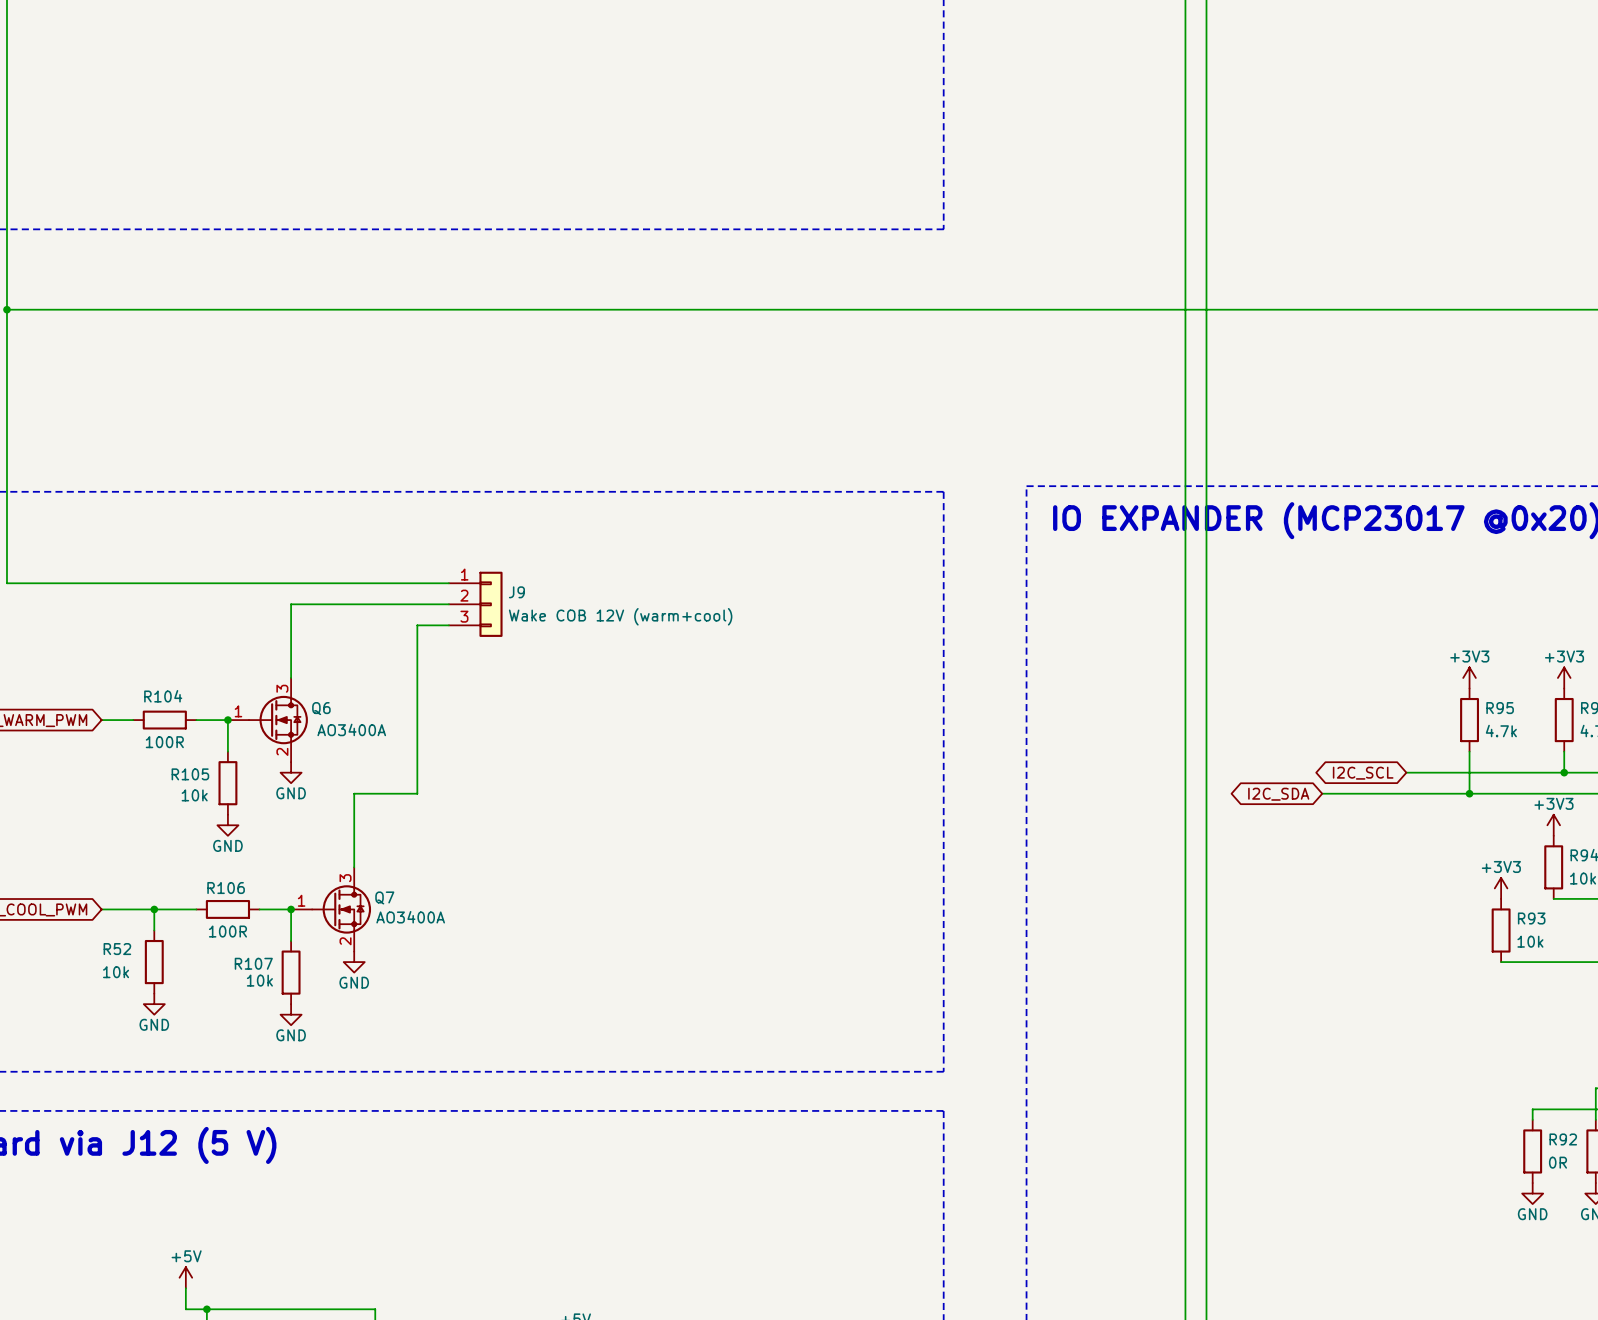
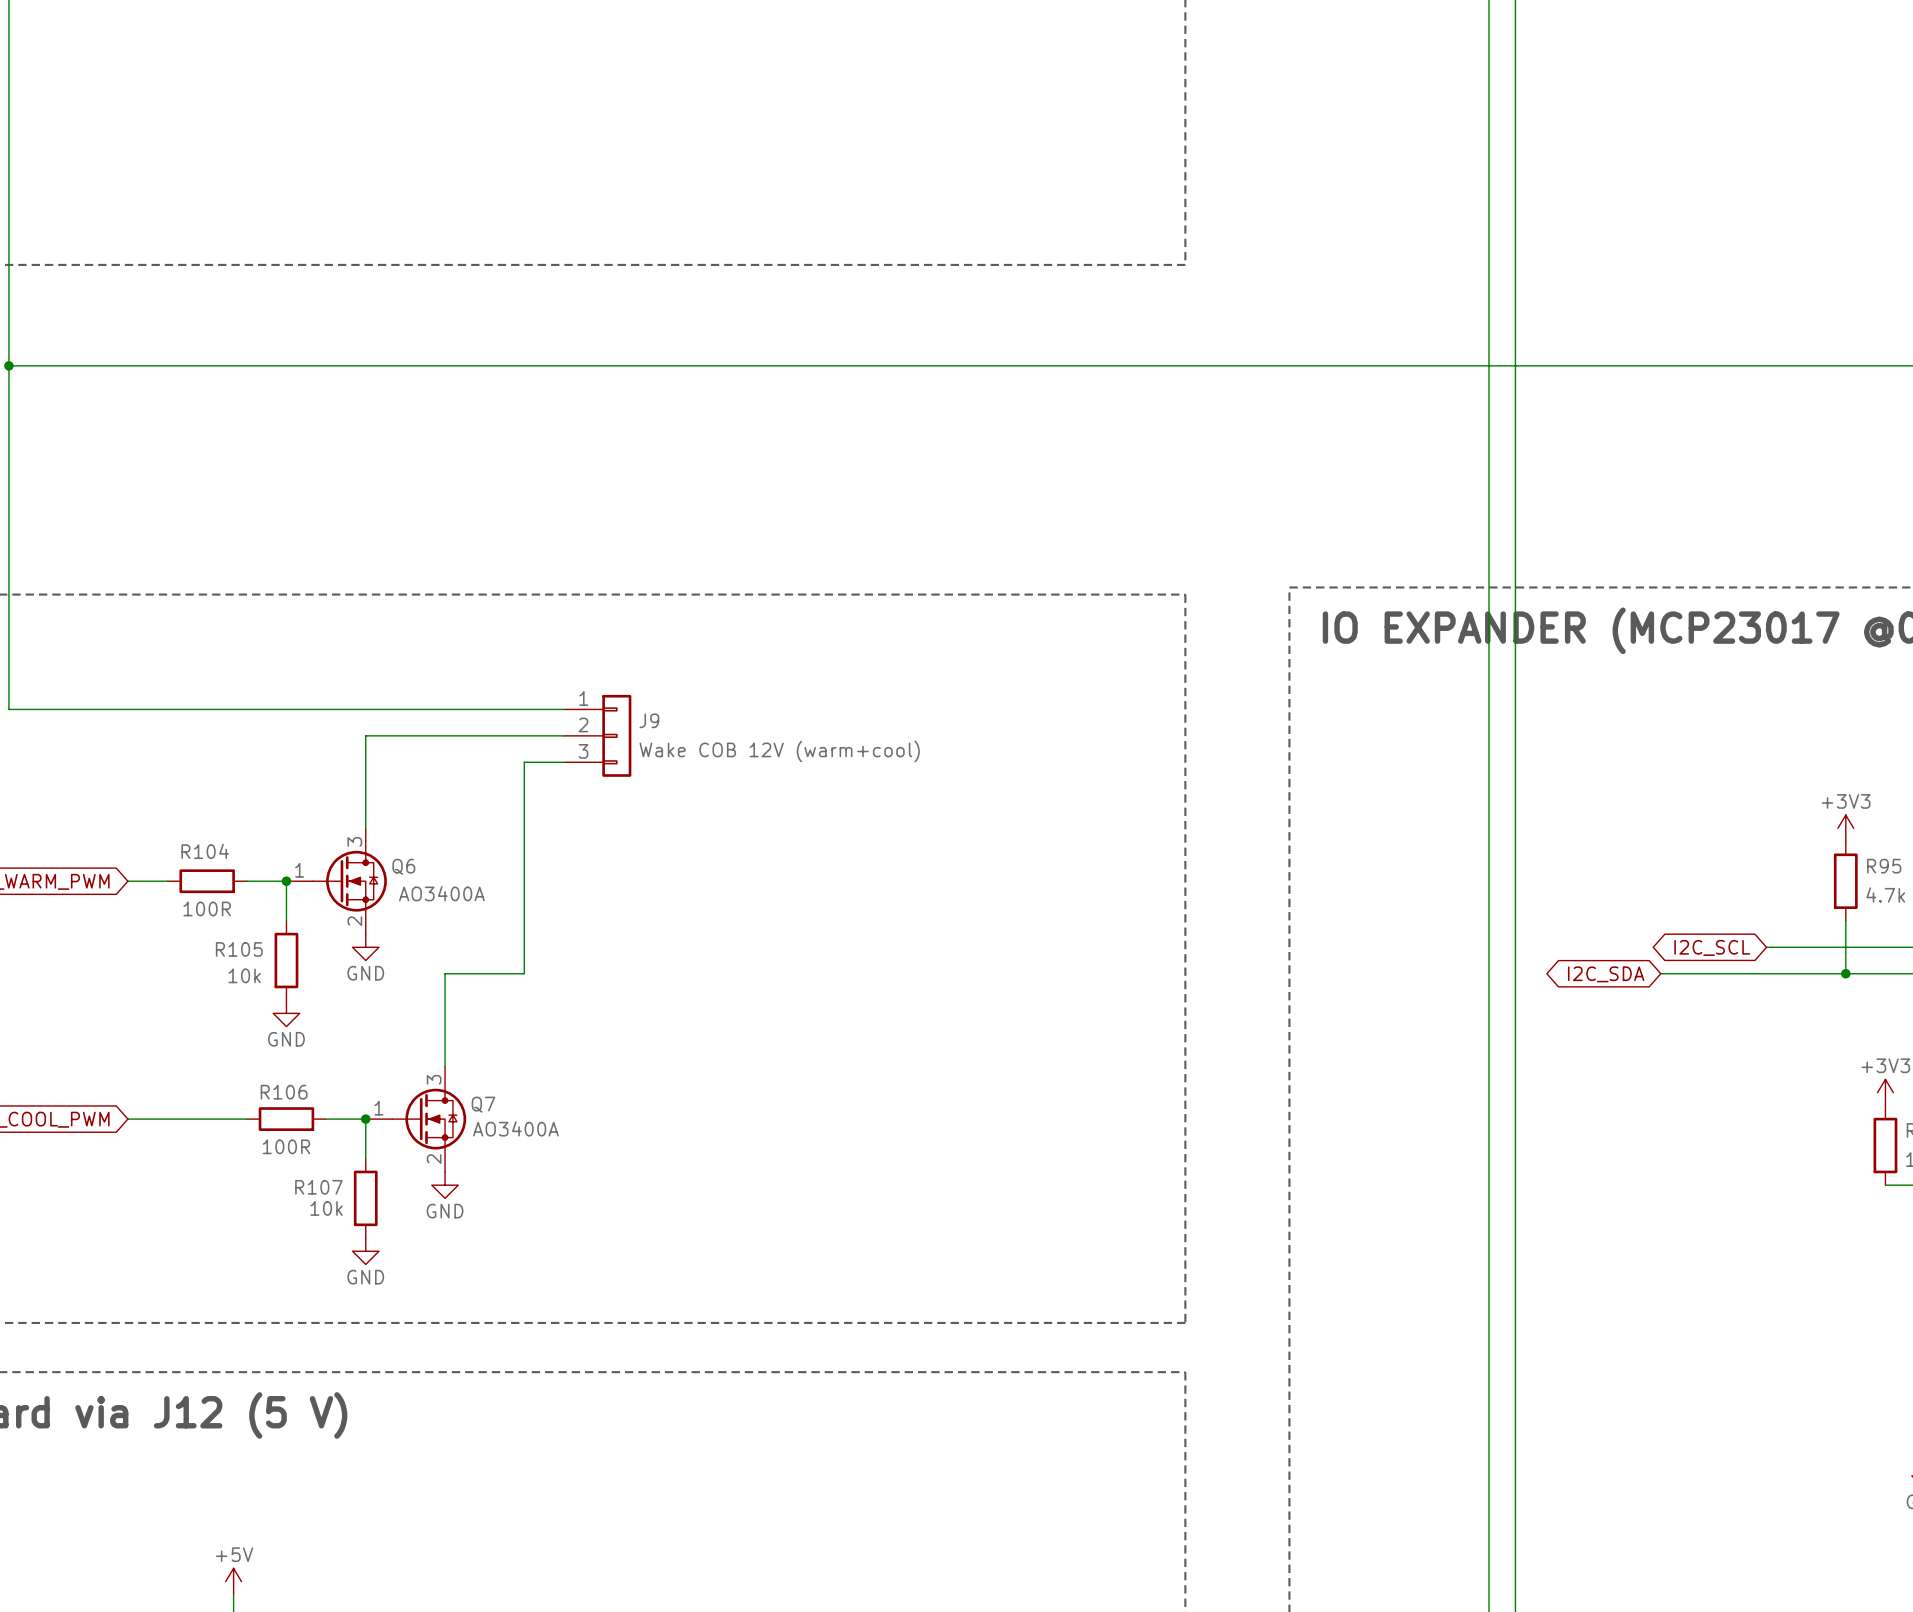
wire: (154, 909) (154, 930) -> none
junction: (154, 909) -> none
R52: 10k (154, 962) -> none
power symbol: GND (154, 1004) -> none

